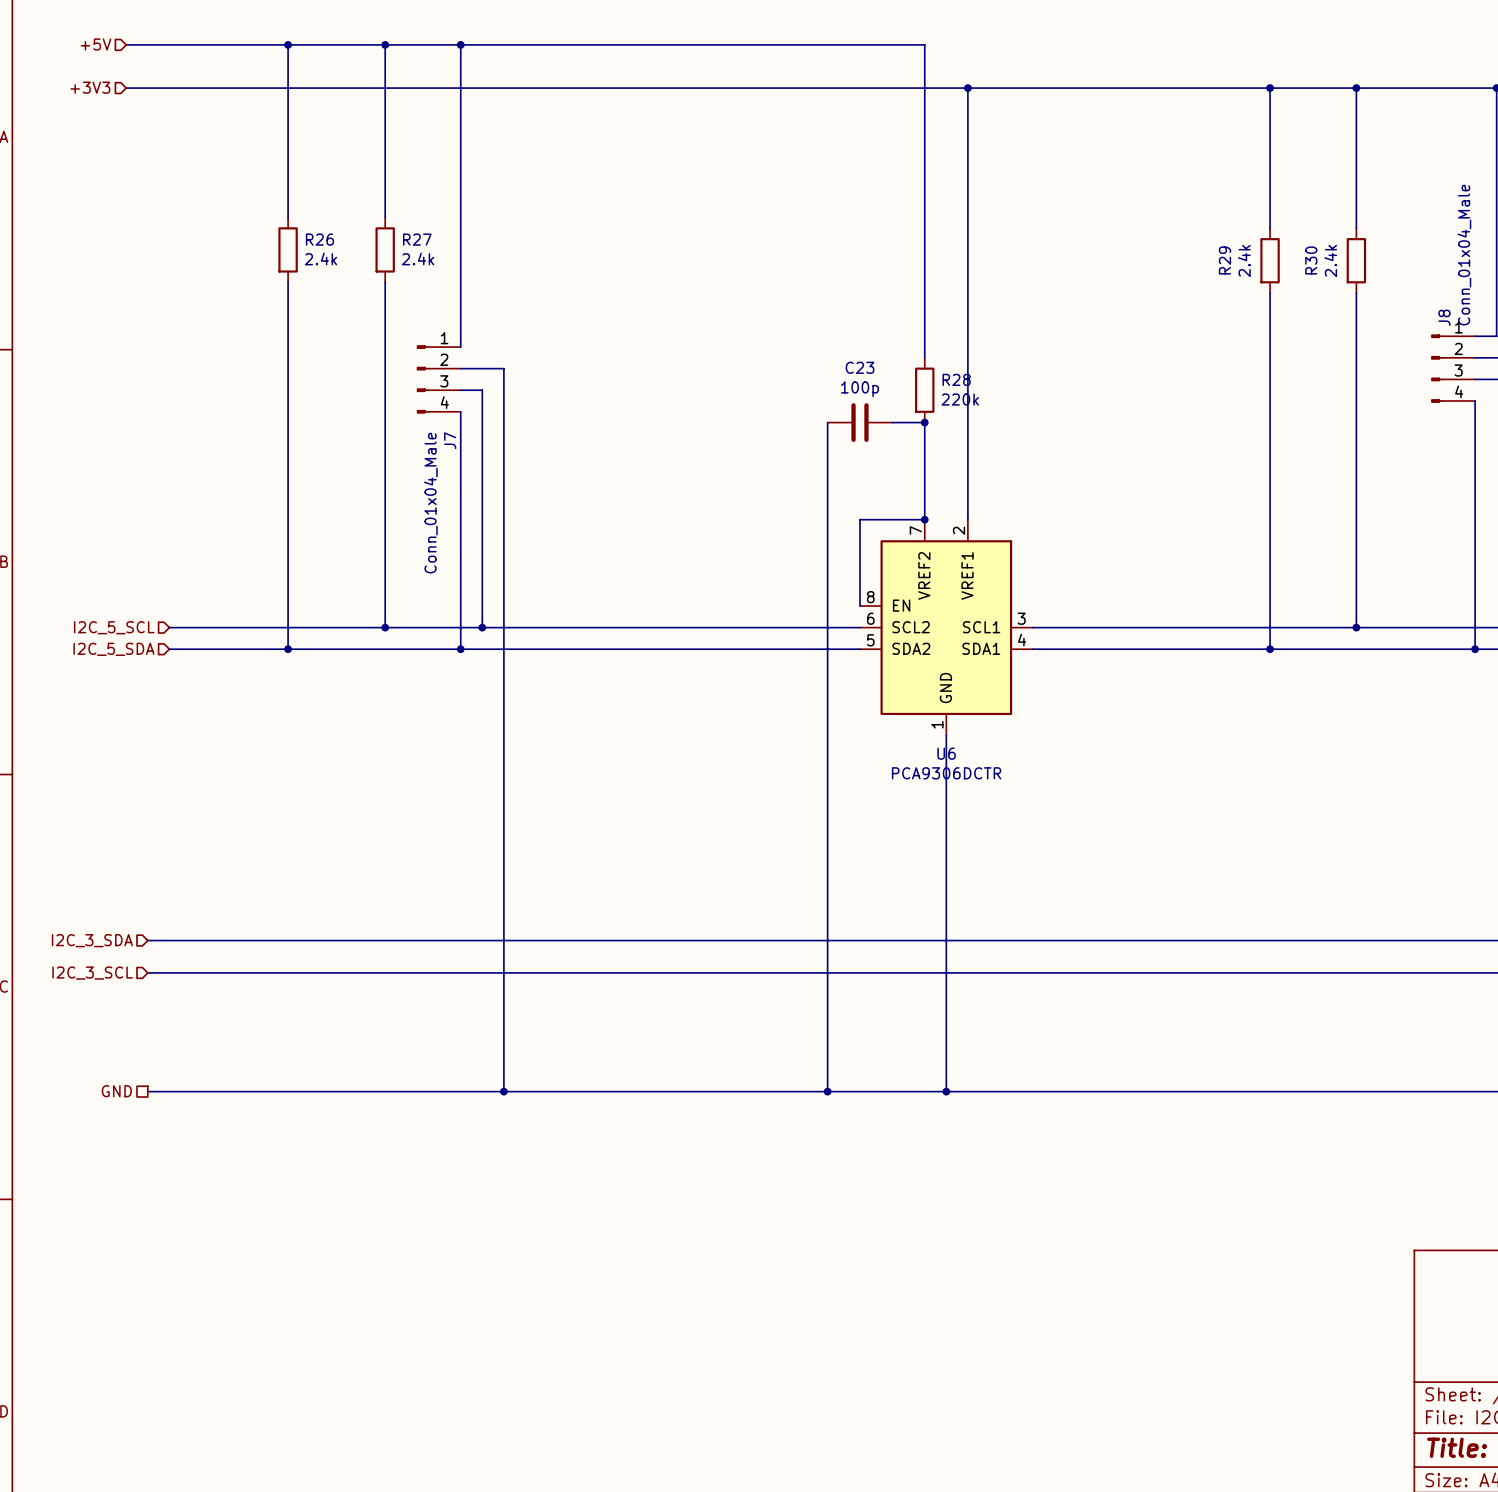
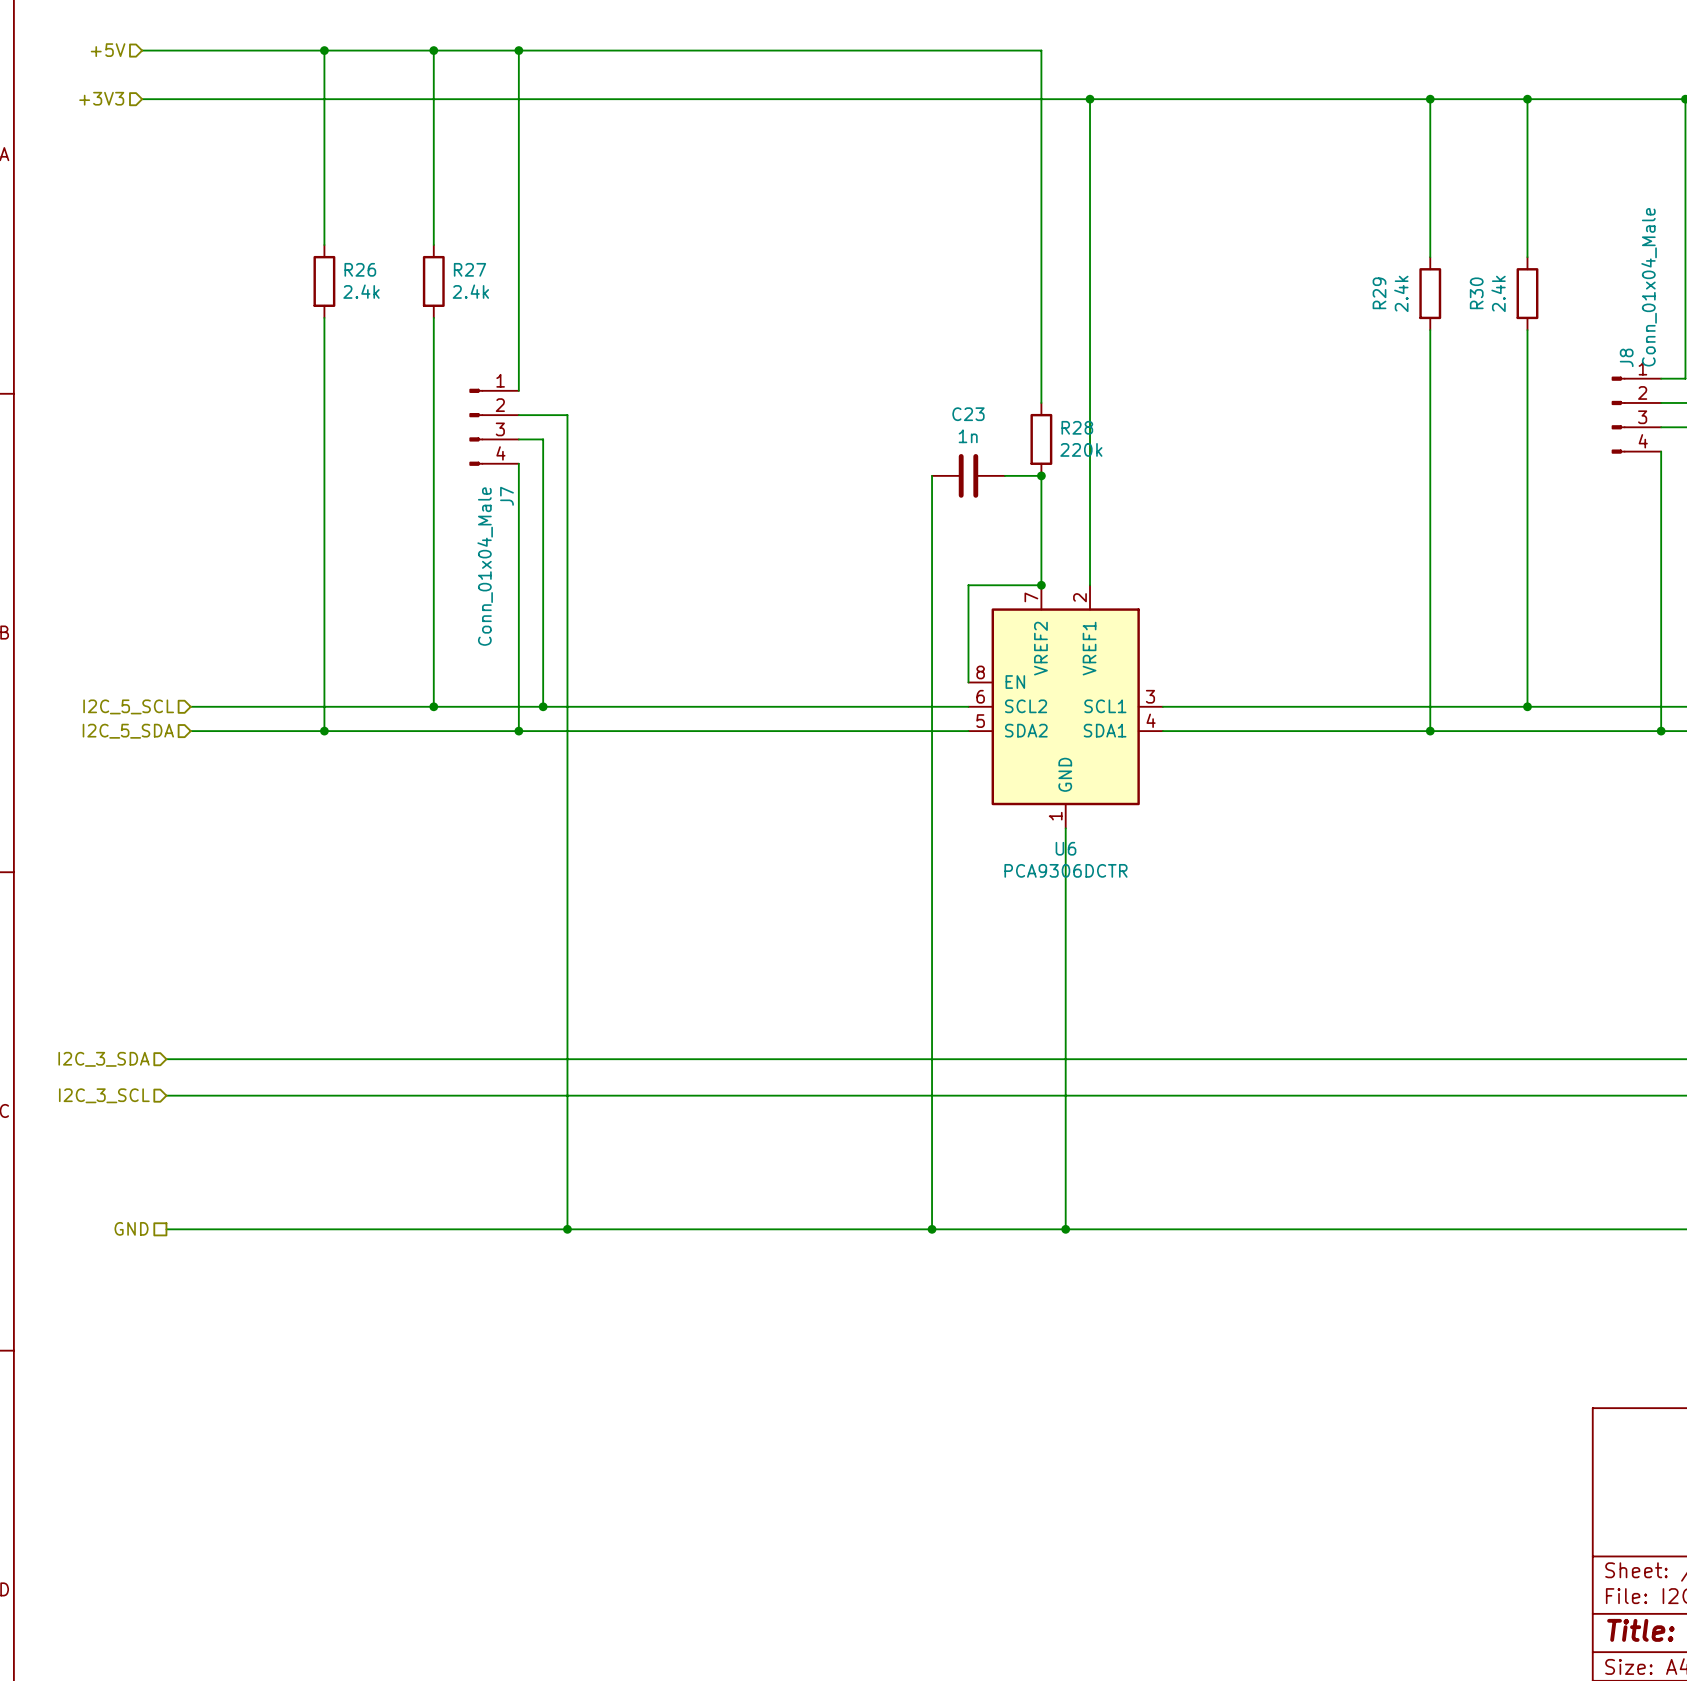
C23 value: 100p (860, 389) -> 1n (968, 436)

